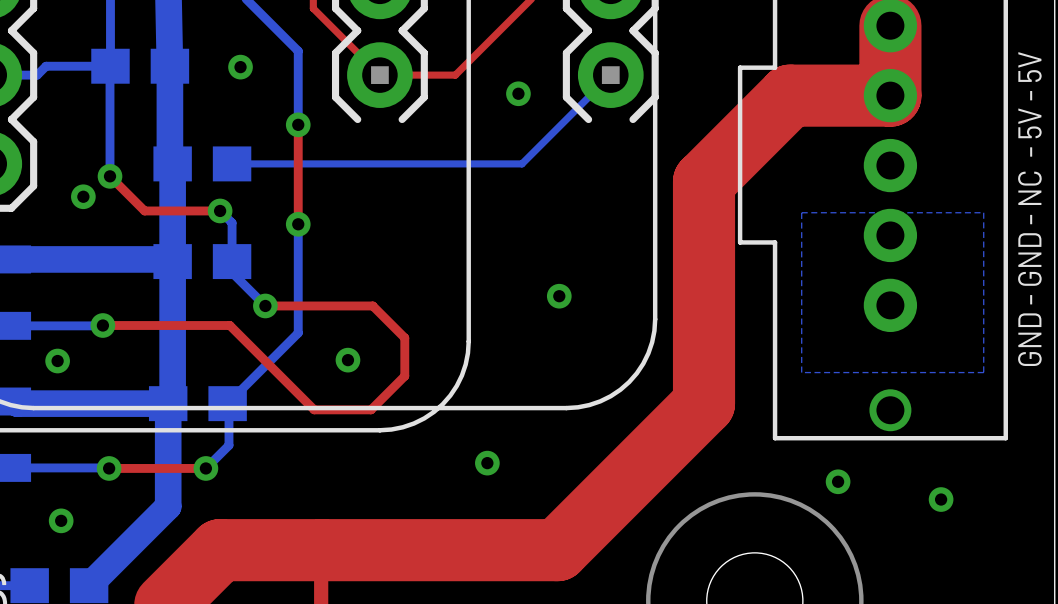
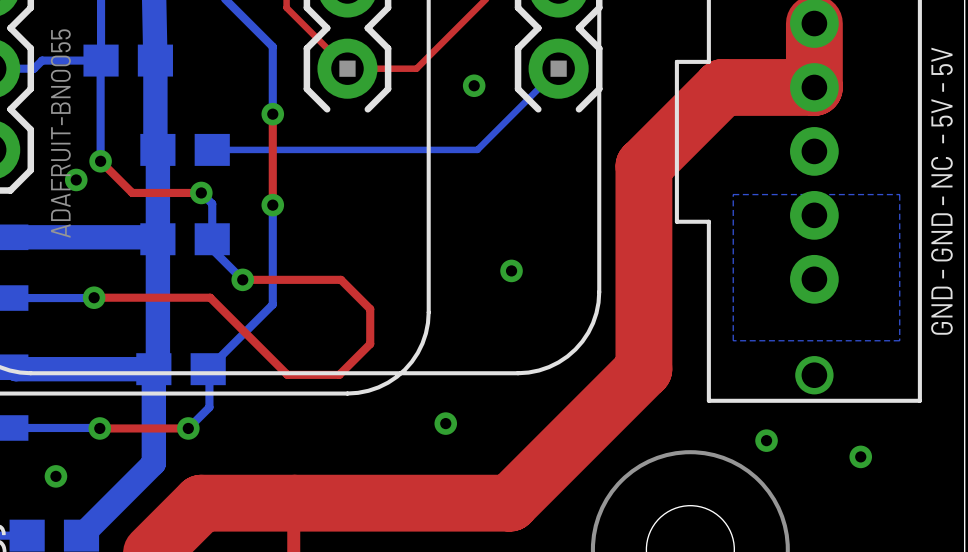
via: (240, 67) -> none
part value: none -> ADAFRUIT-BNO055 (60, 133)
via: (347, 360) -> none
via: (57, 361) -> none

